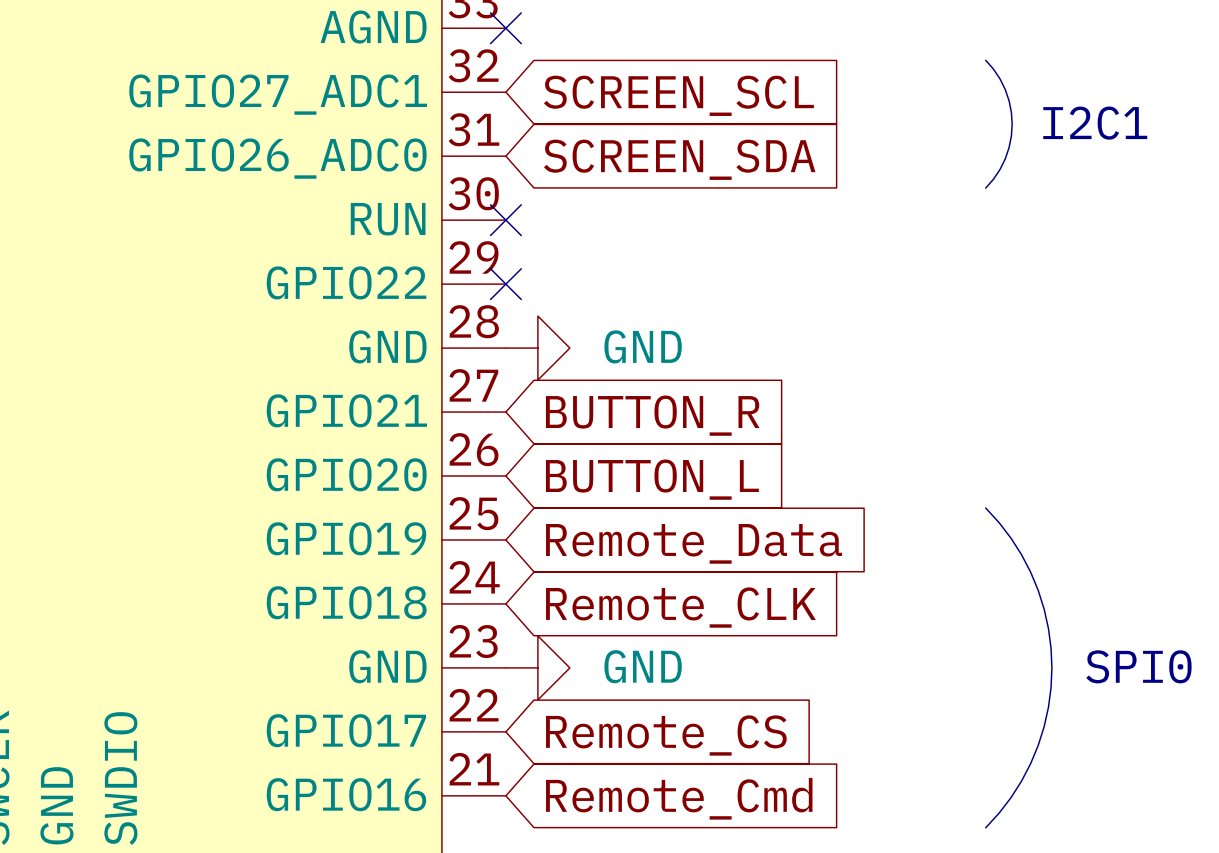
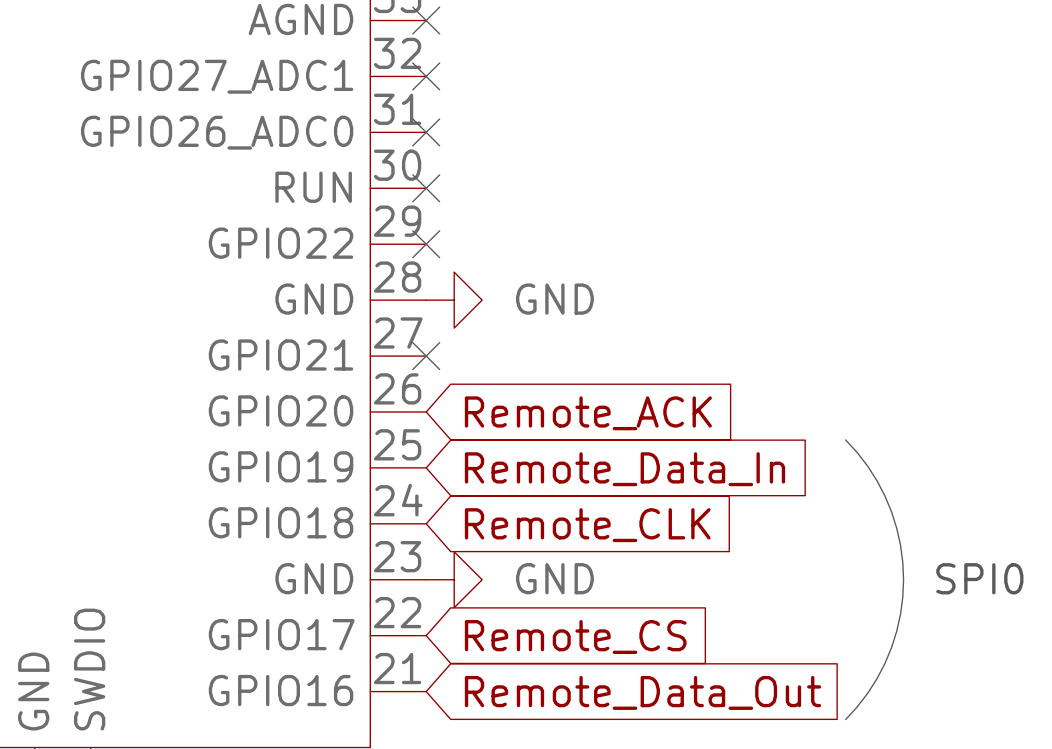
line: (985, 60) (1000, 78) (1005, 89) (1011, 112) (1012, 124) (1011, 136) (1005, 158) (993, 179) (985, 188) -> none
no-connect mark: none -> (426, 76)
global label: SCREEN_SCL (678, 95) -> none
text: I2C1 (1095, 123) -> none
no-connect mark: none -> (426, 132)
global label: SCREEN_SDA (679, 159) -> none
no-connect mark: none -> (426, 356)
global label: BUTTON_R (652, 415) -> none
global label: BUTTON_L (652, 479) -> Remote_ACK (588, 413)
global label: Remote_Data (694, 543) -> Remote_Data_In (625, 469)
global label: Remote_Cmd (679, 798) -> Remote_Data_Out (642, 692)

